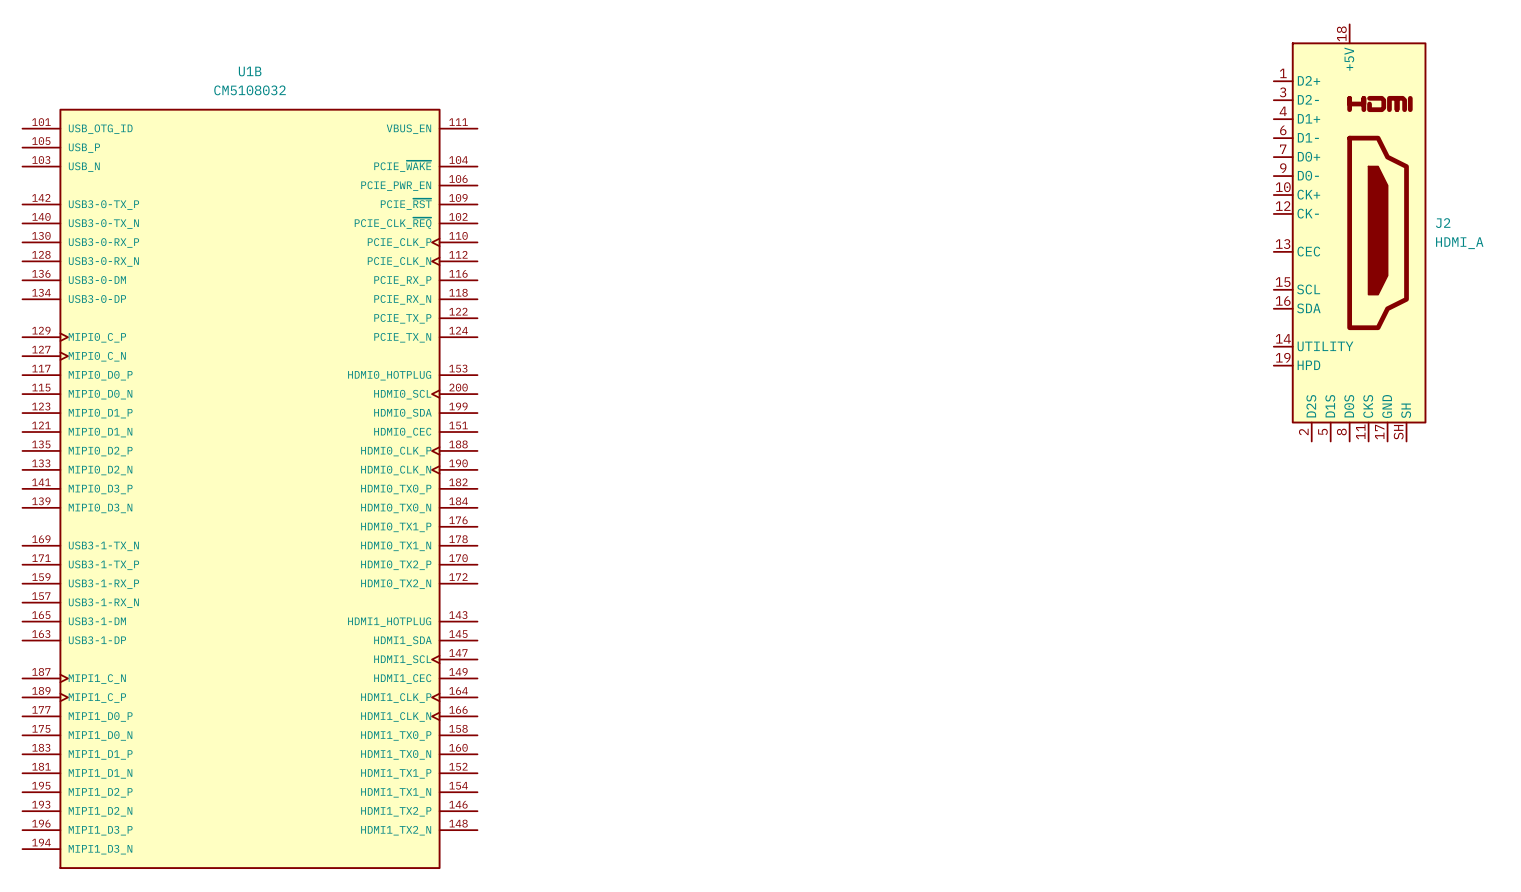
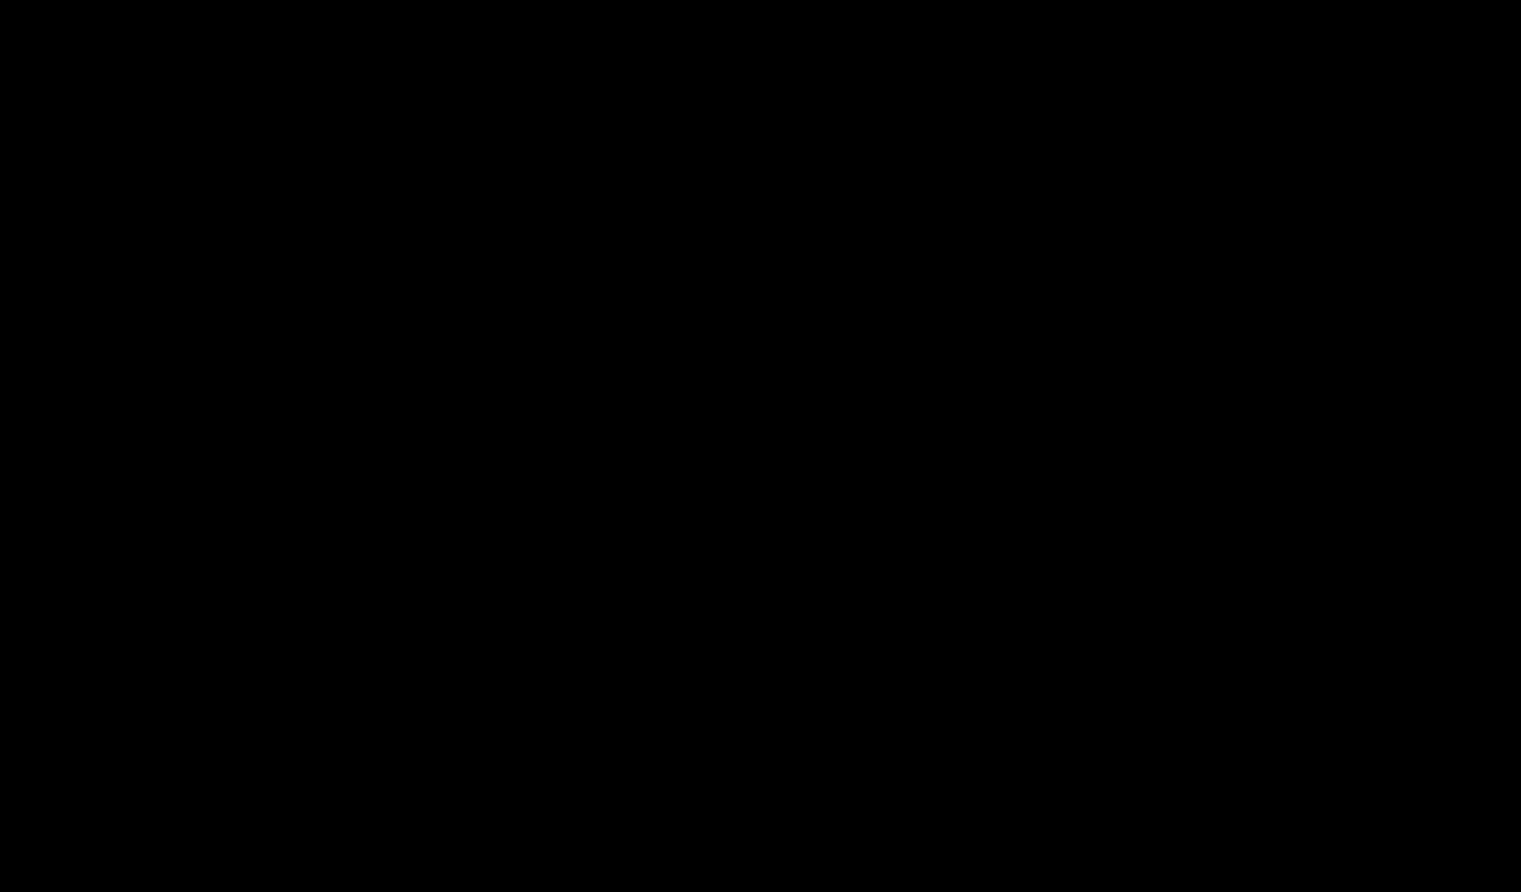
J2: HDMI_A (1350, 232) -> none
U1B: CM5108032 (249, 488) -> none

